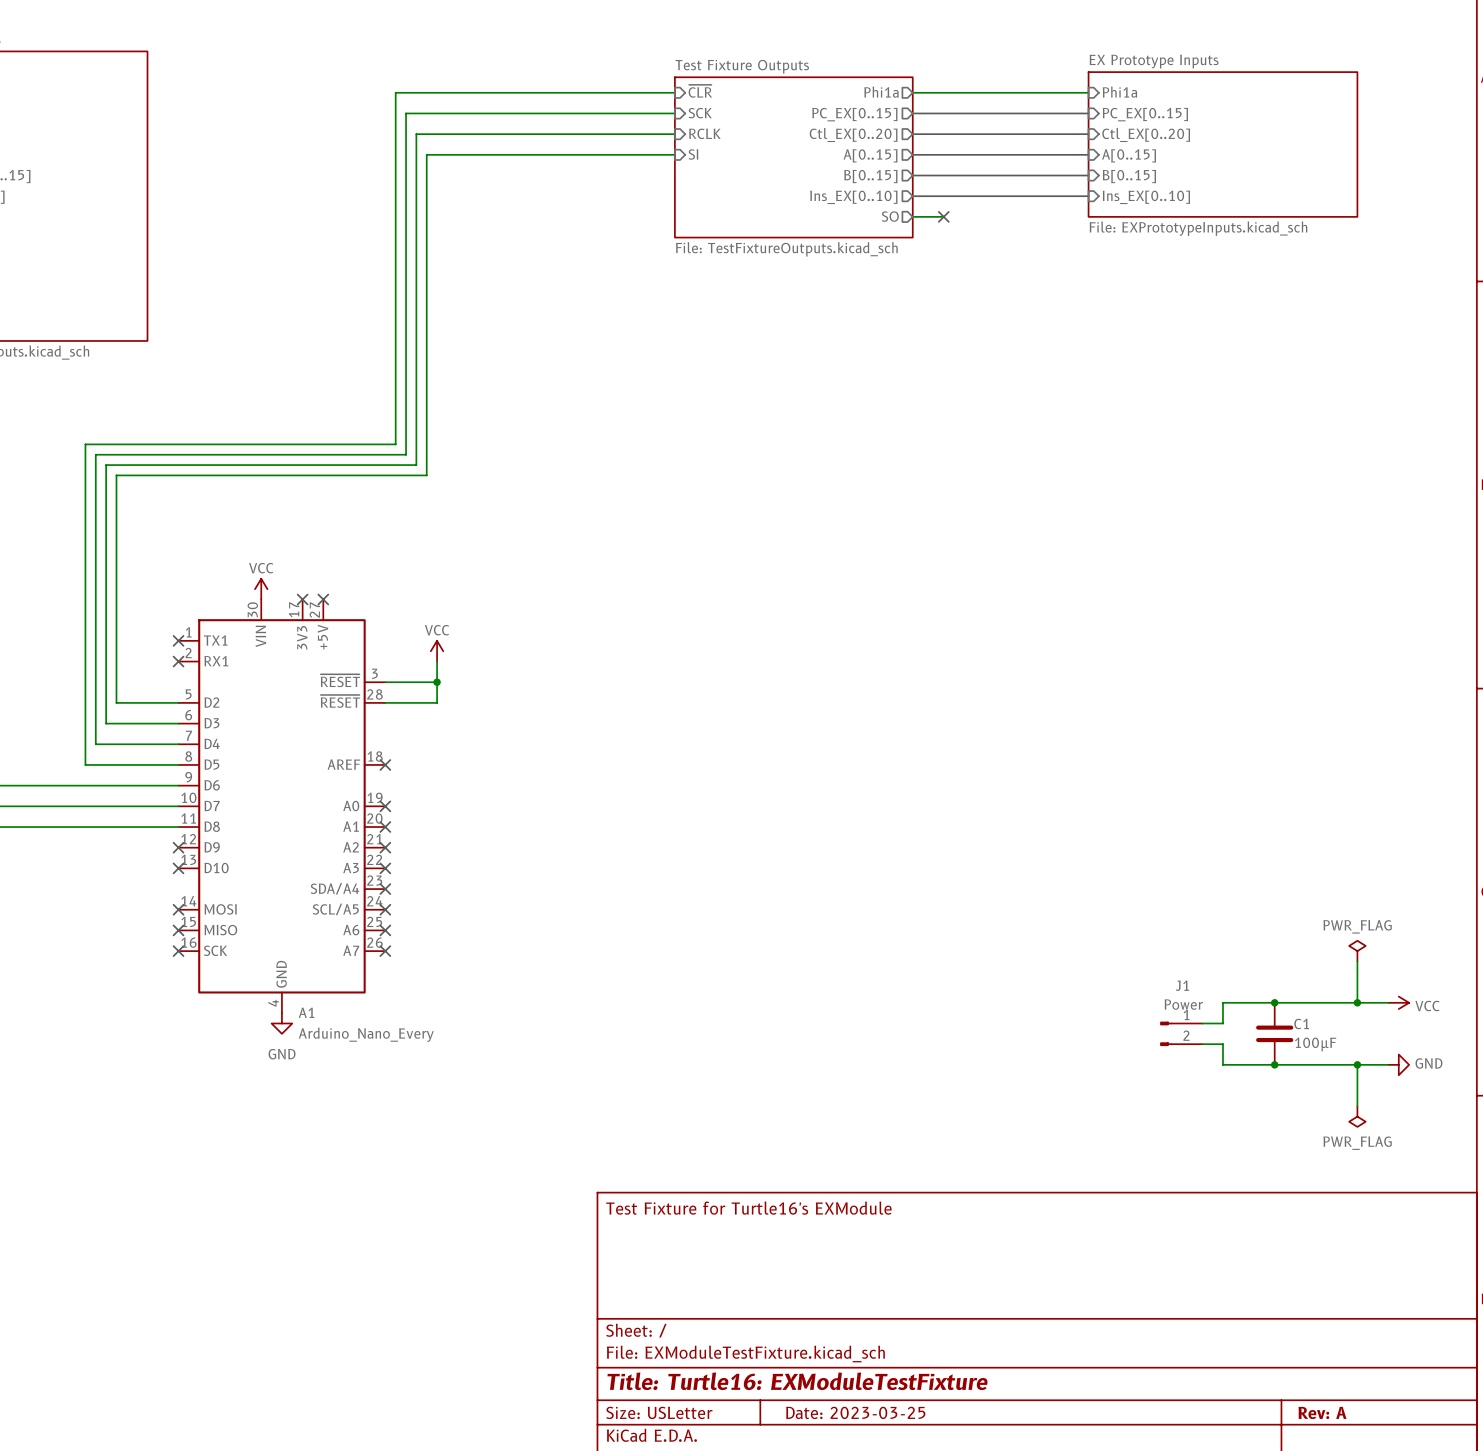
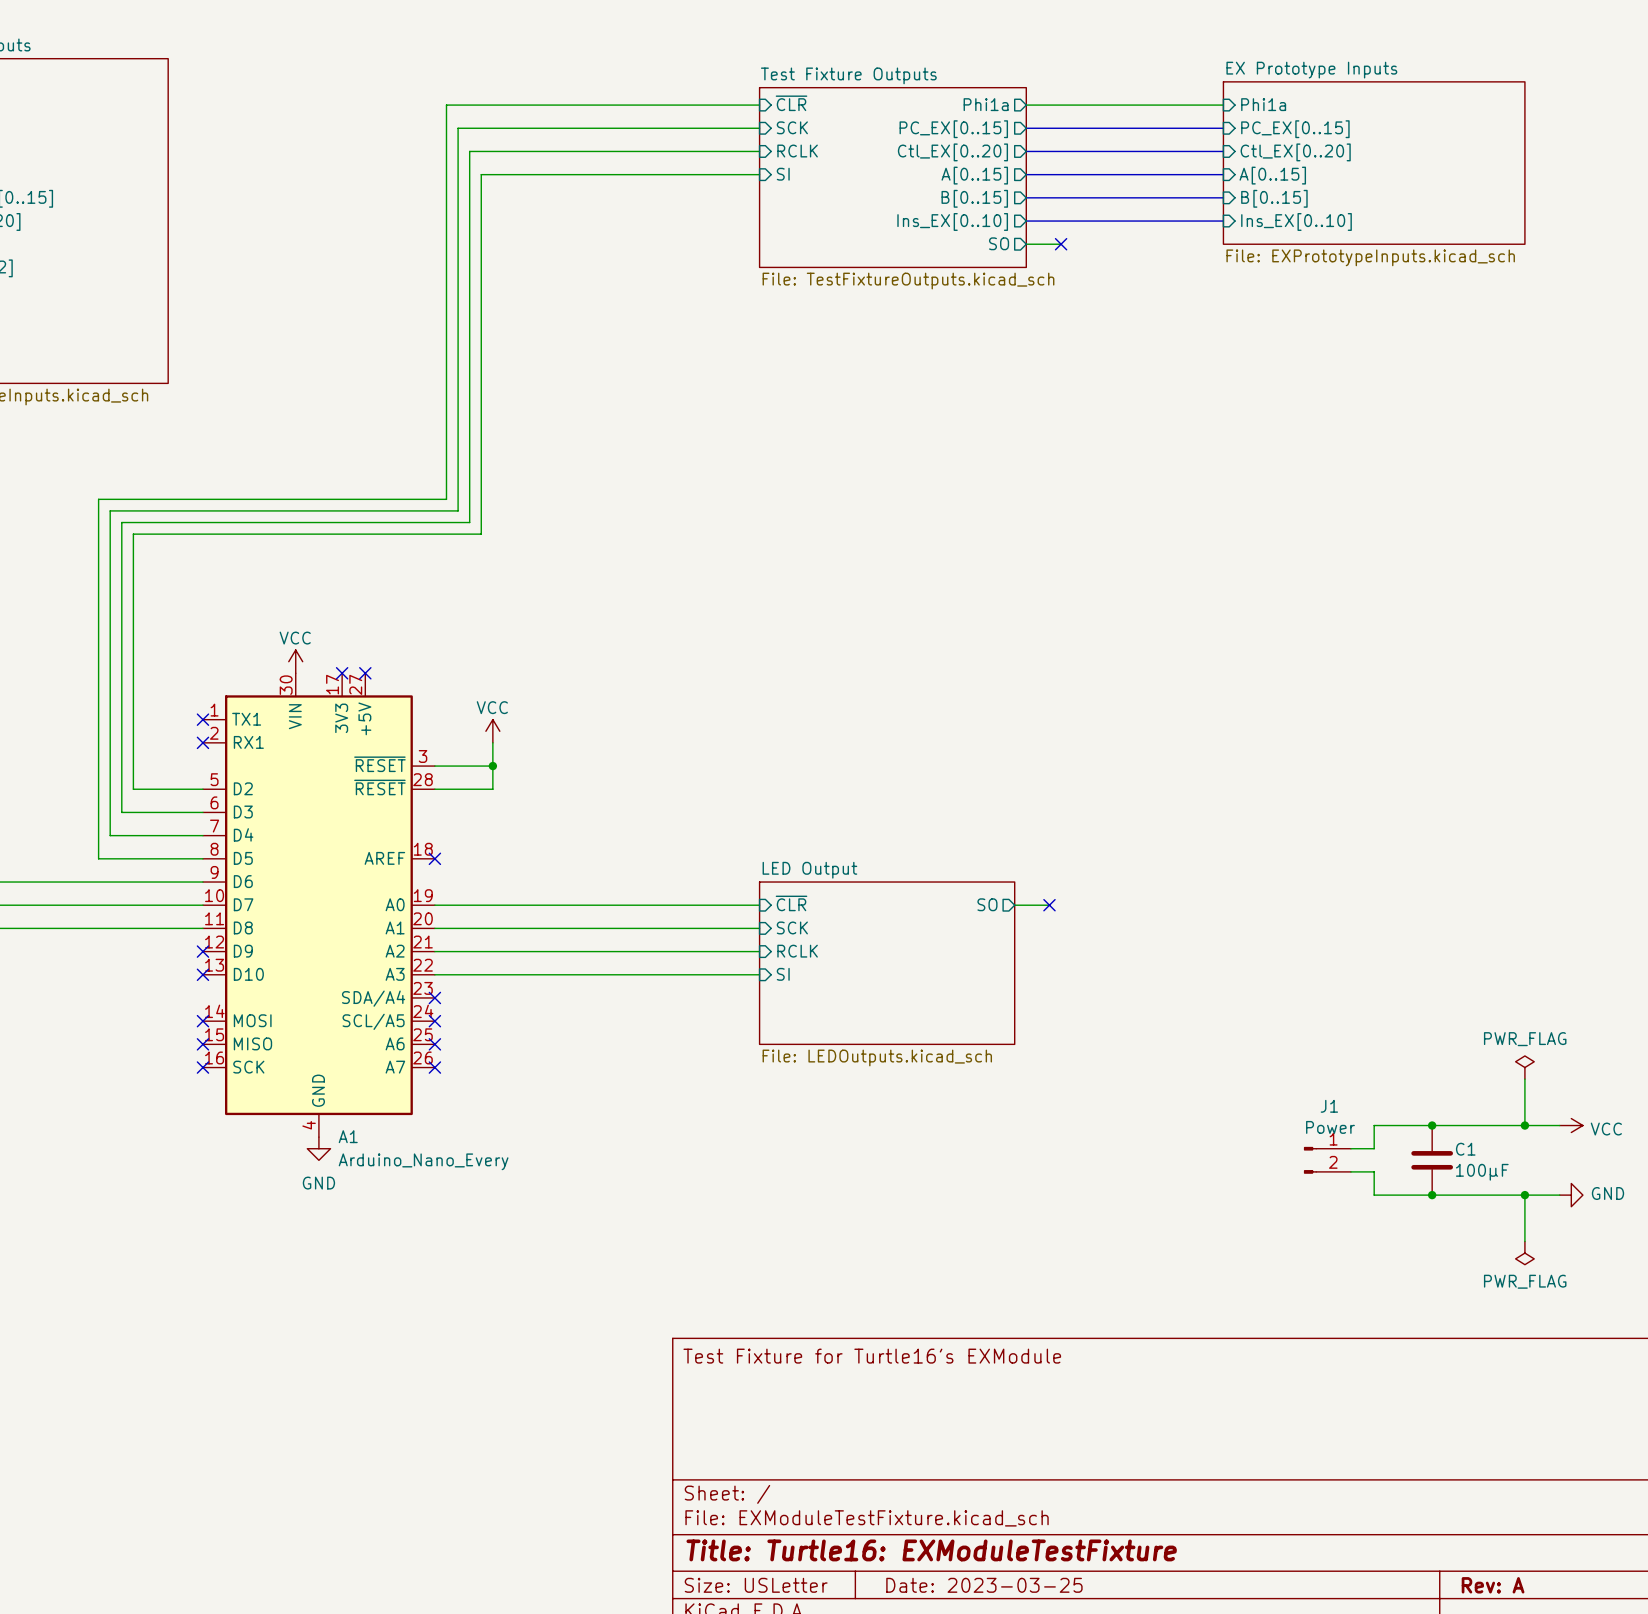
sheet pin: none -> ~{CLR} (791, 903)
wire: none -> (434, 905) (759, 905)
no-connect mark: (385, 806) -> none
sheet pin: none -> SO (987, 904)
wire: none -> (1014, 905) (1049, 905)
no-connect mark: none -> (1049, 905)
sheet pin: none -> SCK (792, 927)
wire: none -> (434, 928) (759, 928)
no-connect mark: (385, 827) -> none
wire: none -> (434, 951) (759, 951)
no-connect mark: (385, 847) -> none
sheet pin: none -> RCLK (797, 951)
sheet LED Output: none -> File: LEDOutputs.kicad_sch (887, 963)
wire: none -> (434, 974) (759, 974)
no-connect mark: (385, 868) -> none
sheet pin: none -> SI (783, 974)

